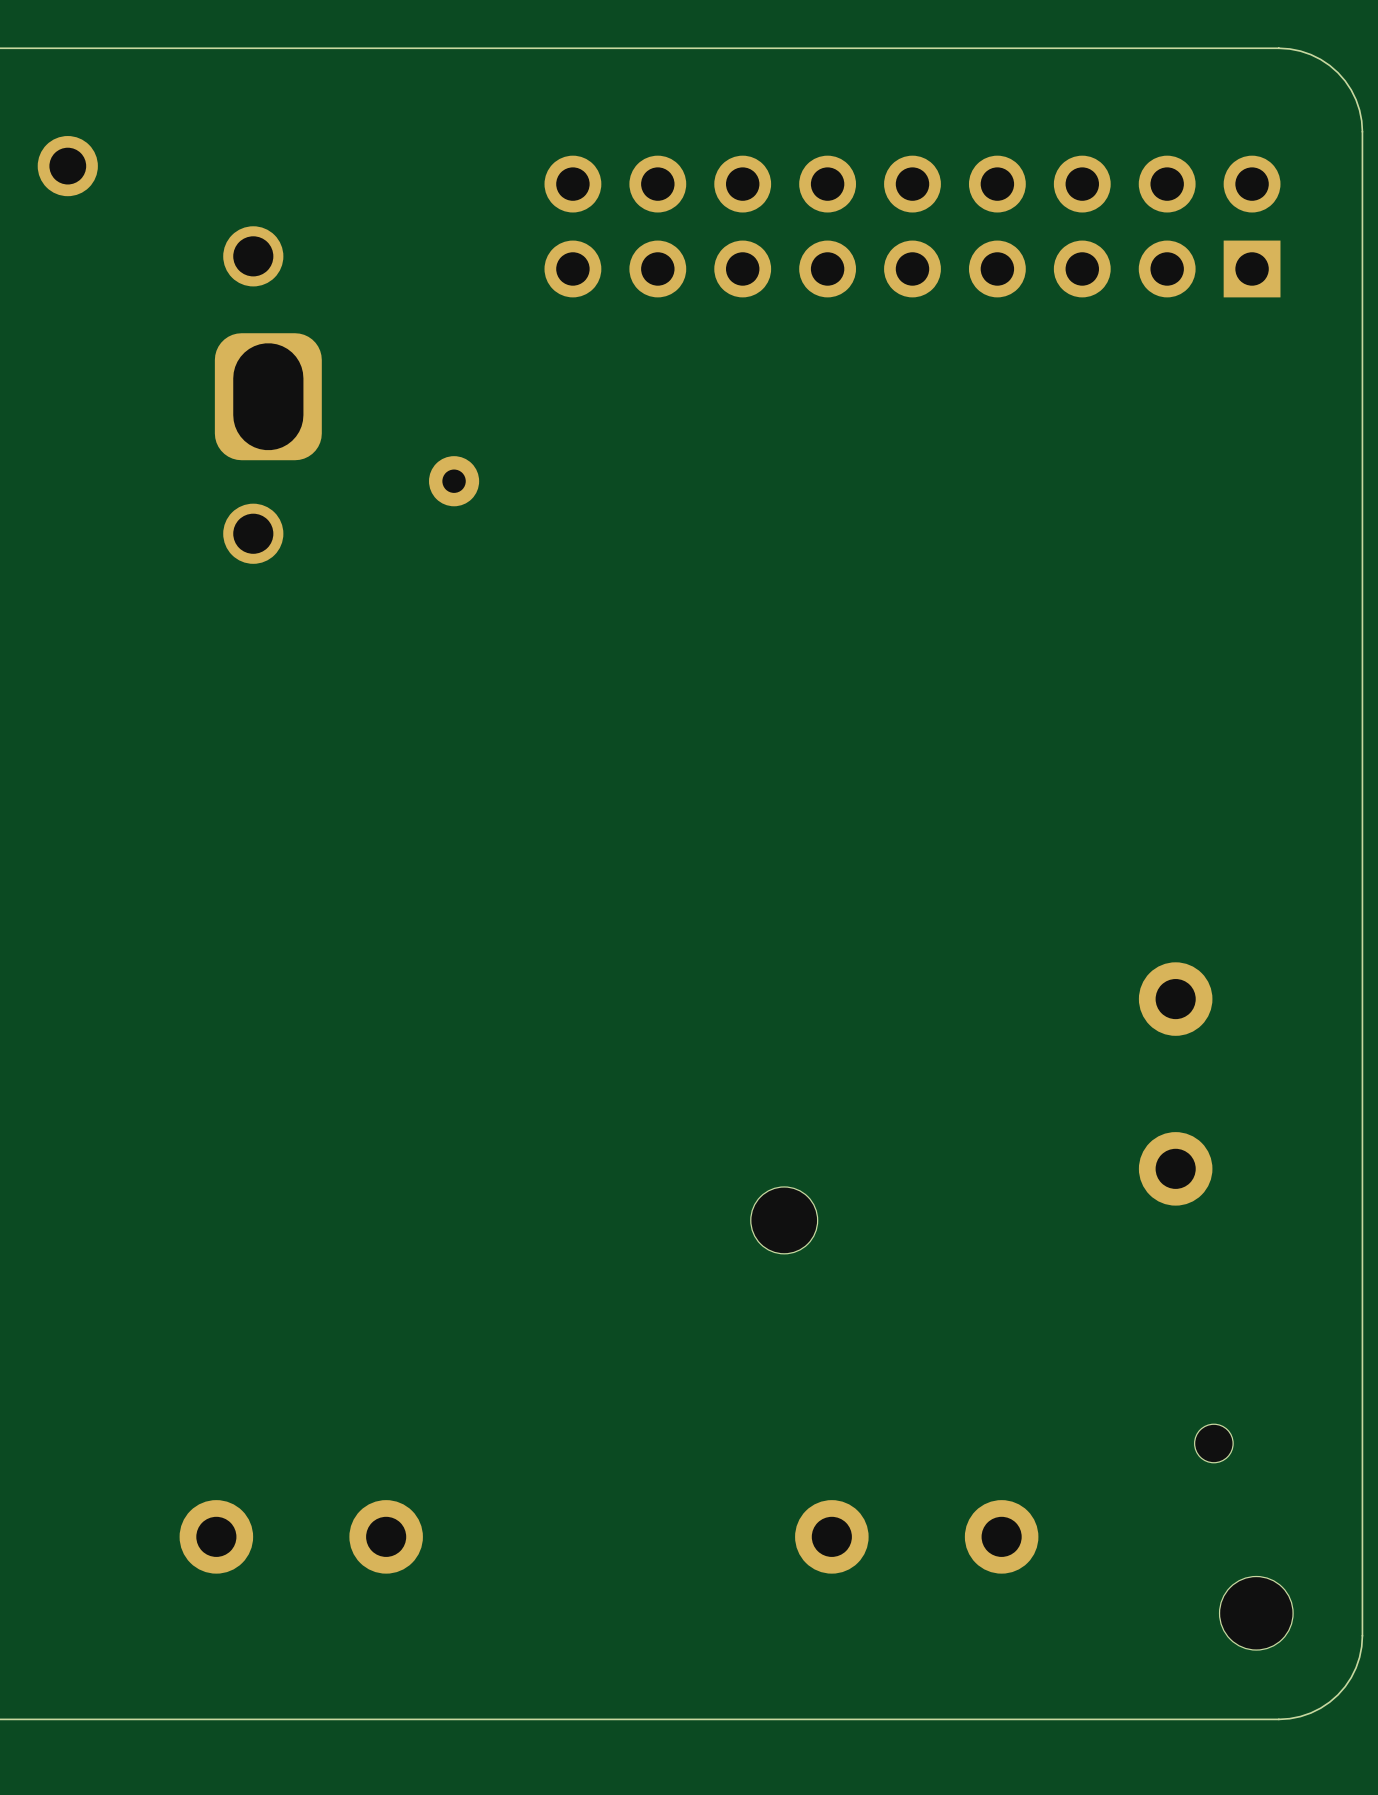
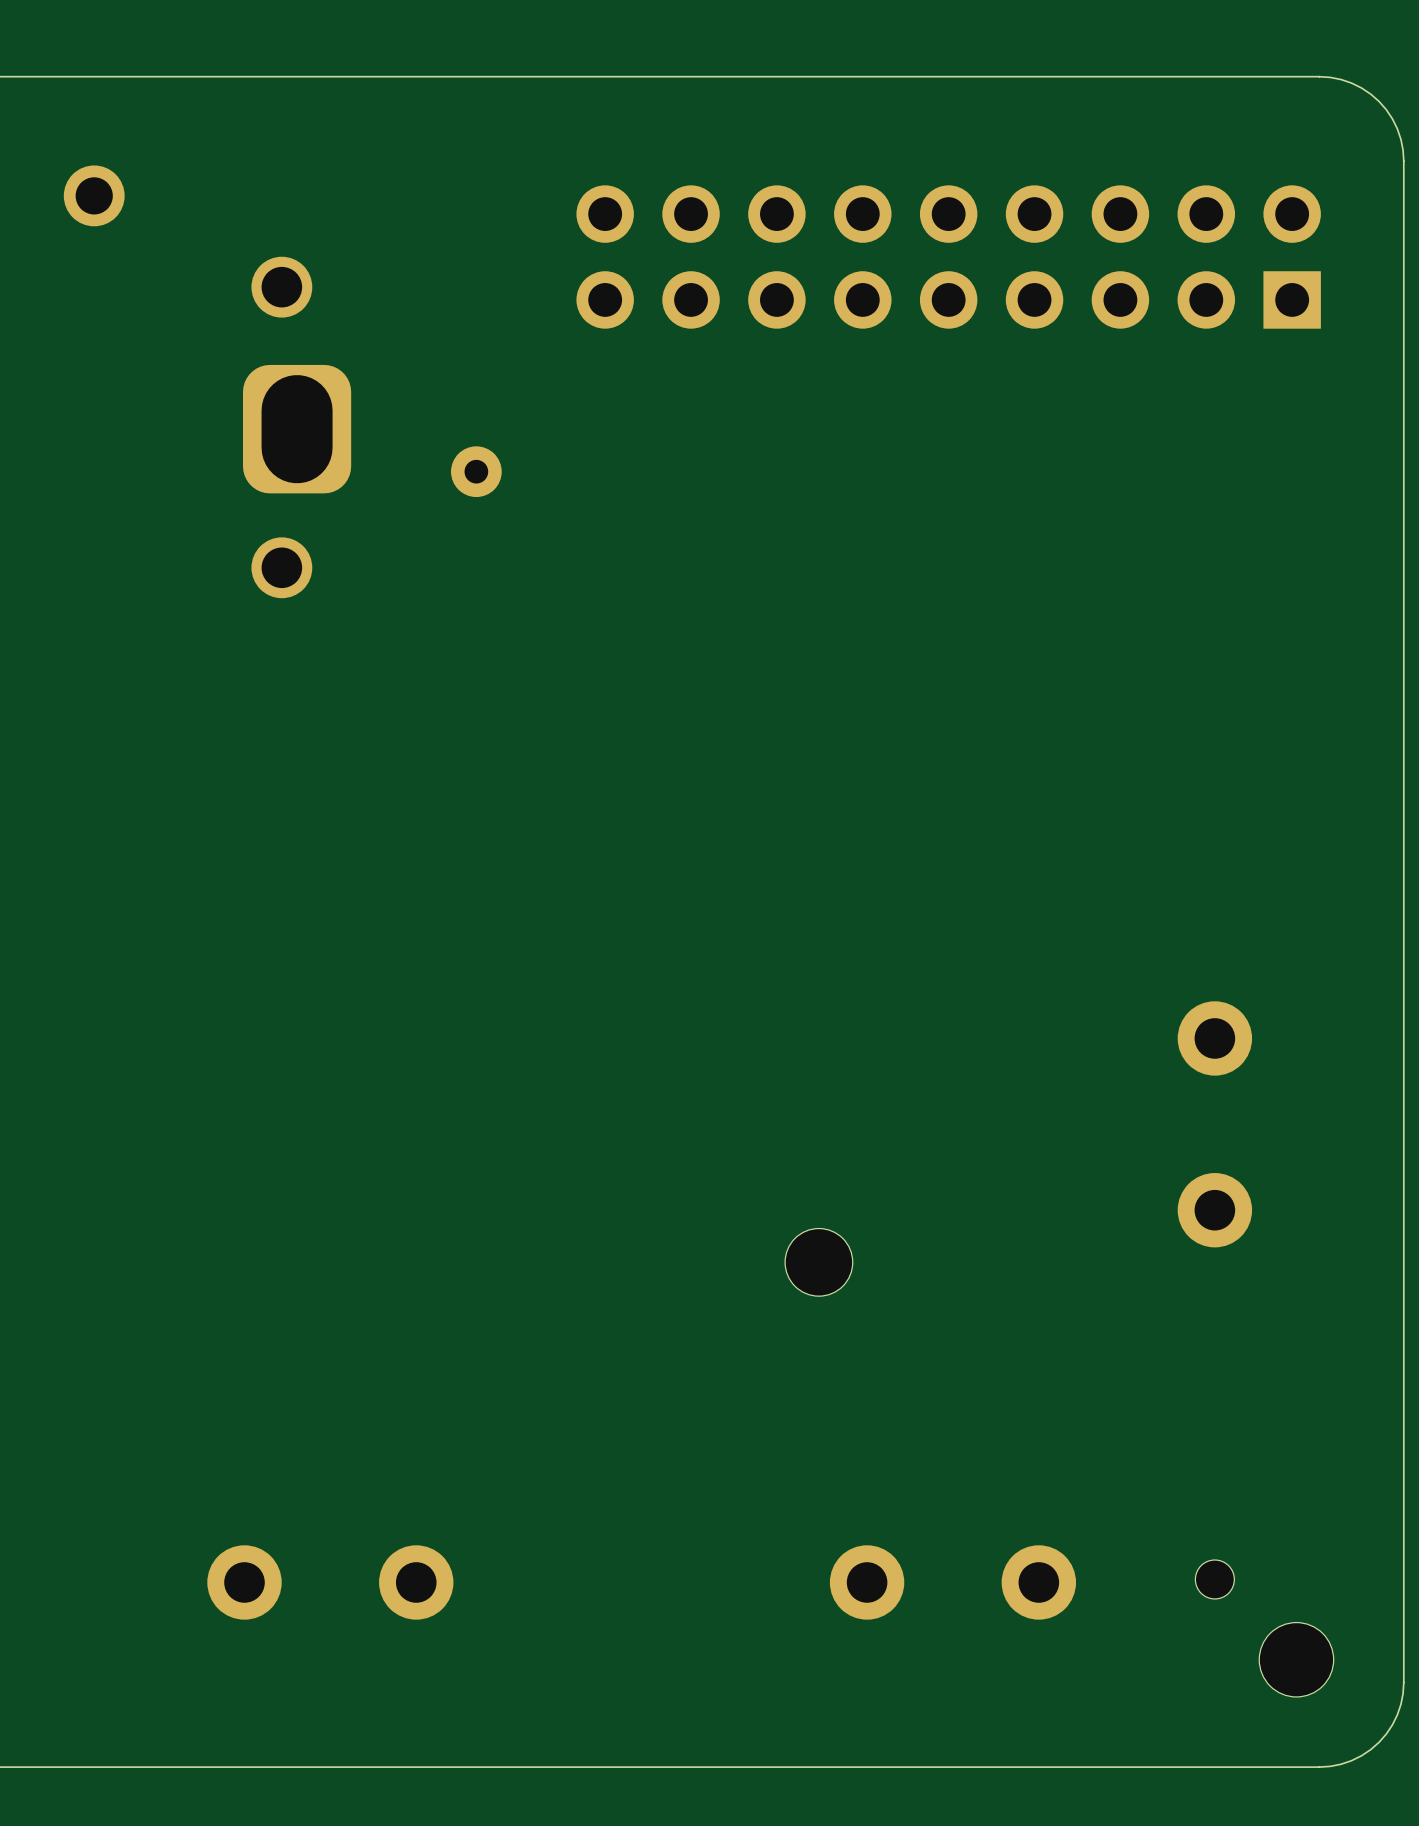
part position: (454, 481) -> (476, 471)
part position: (1213, 1443) -> (1214, 1579)

